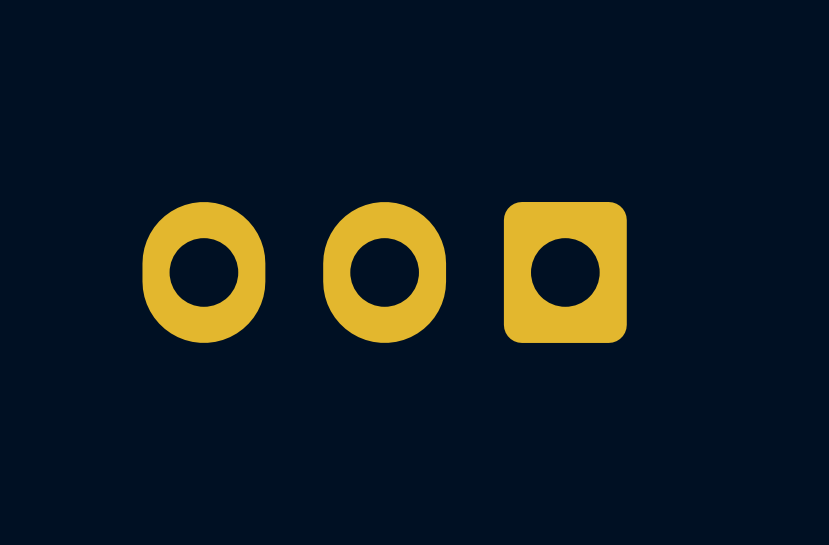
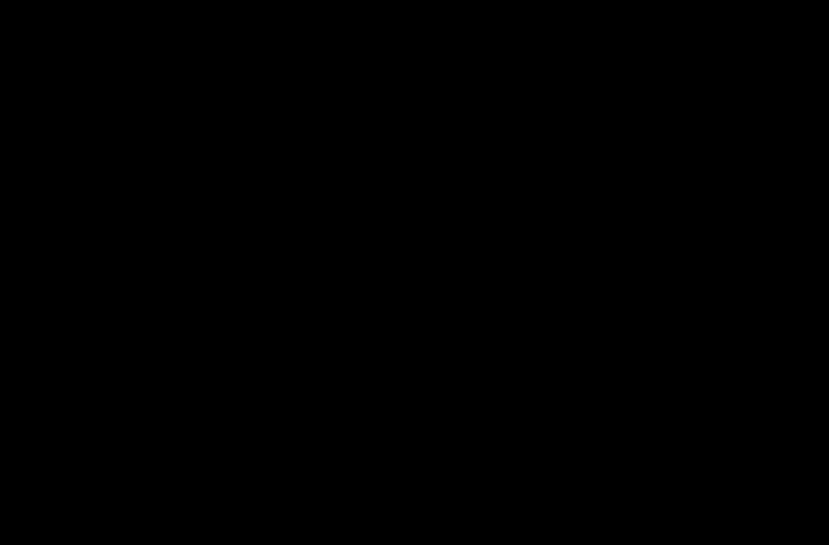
part: (384, 272) -> none

